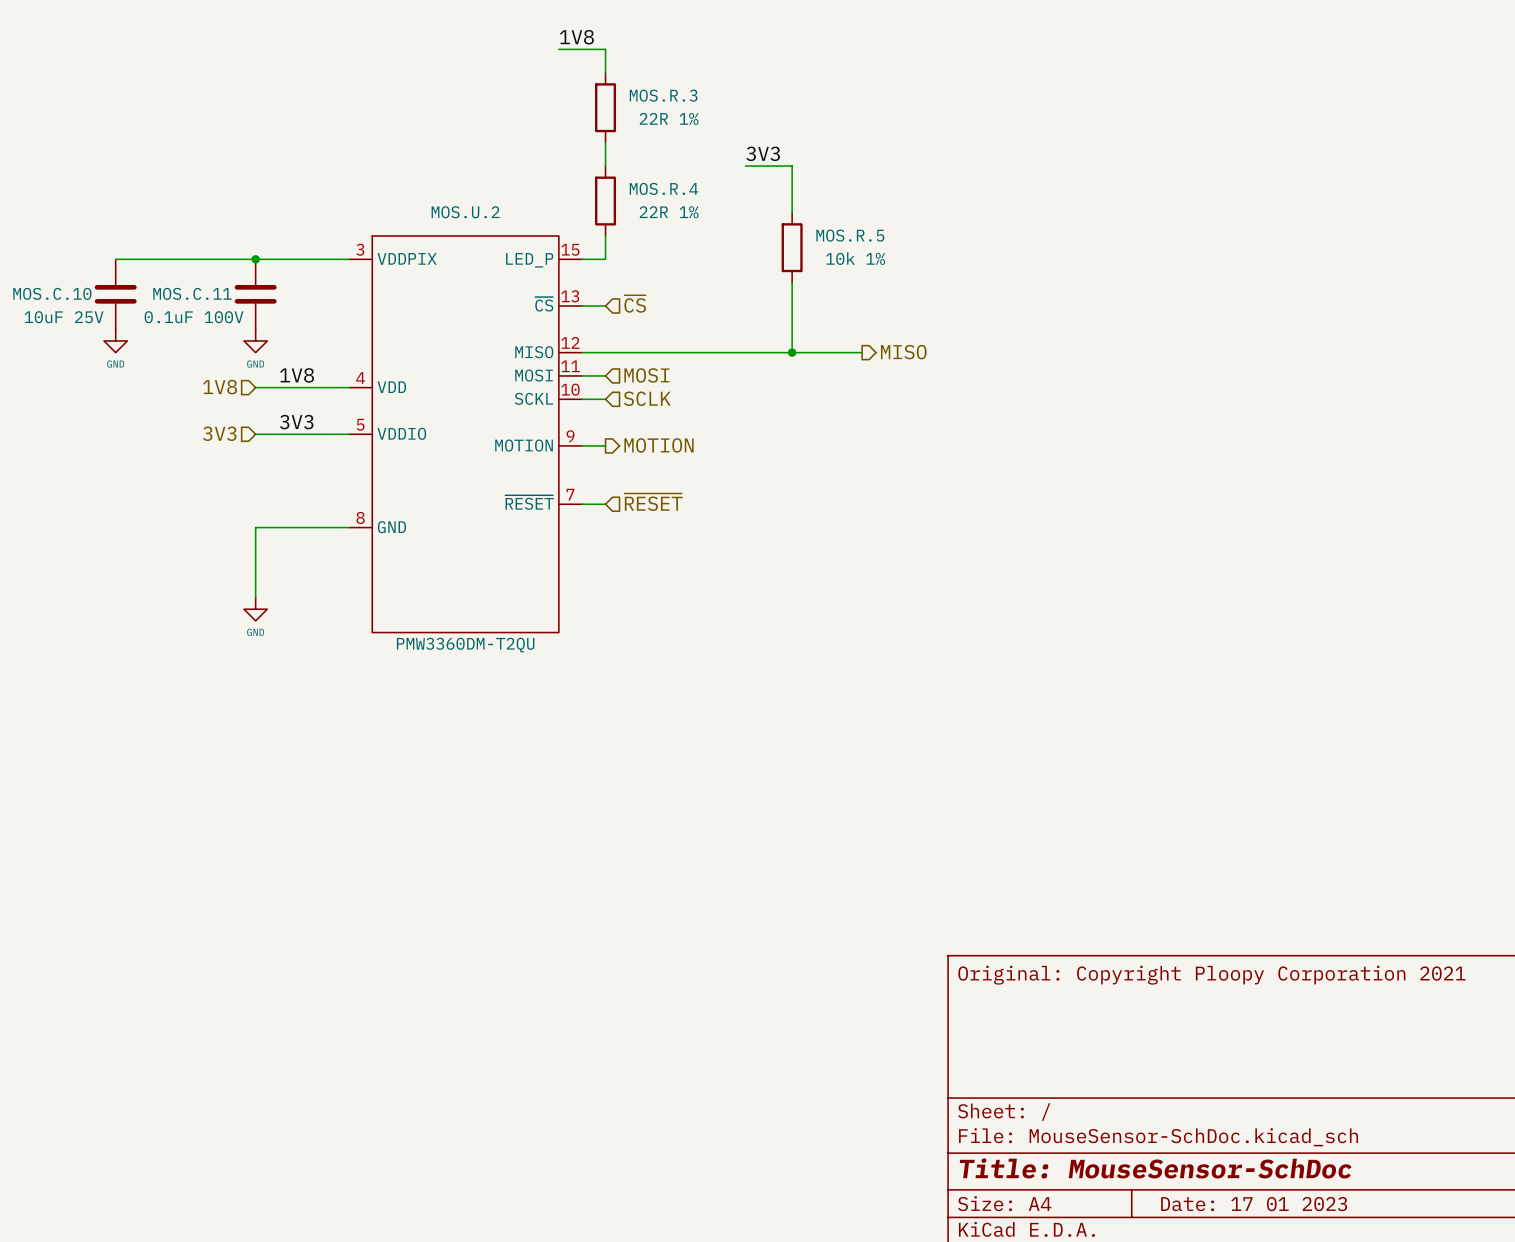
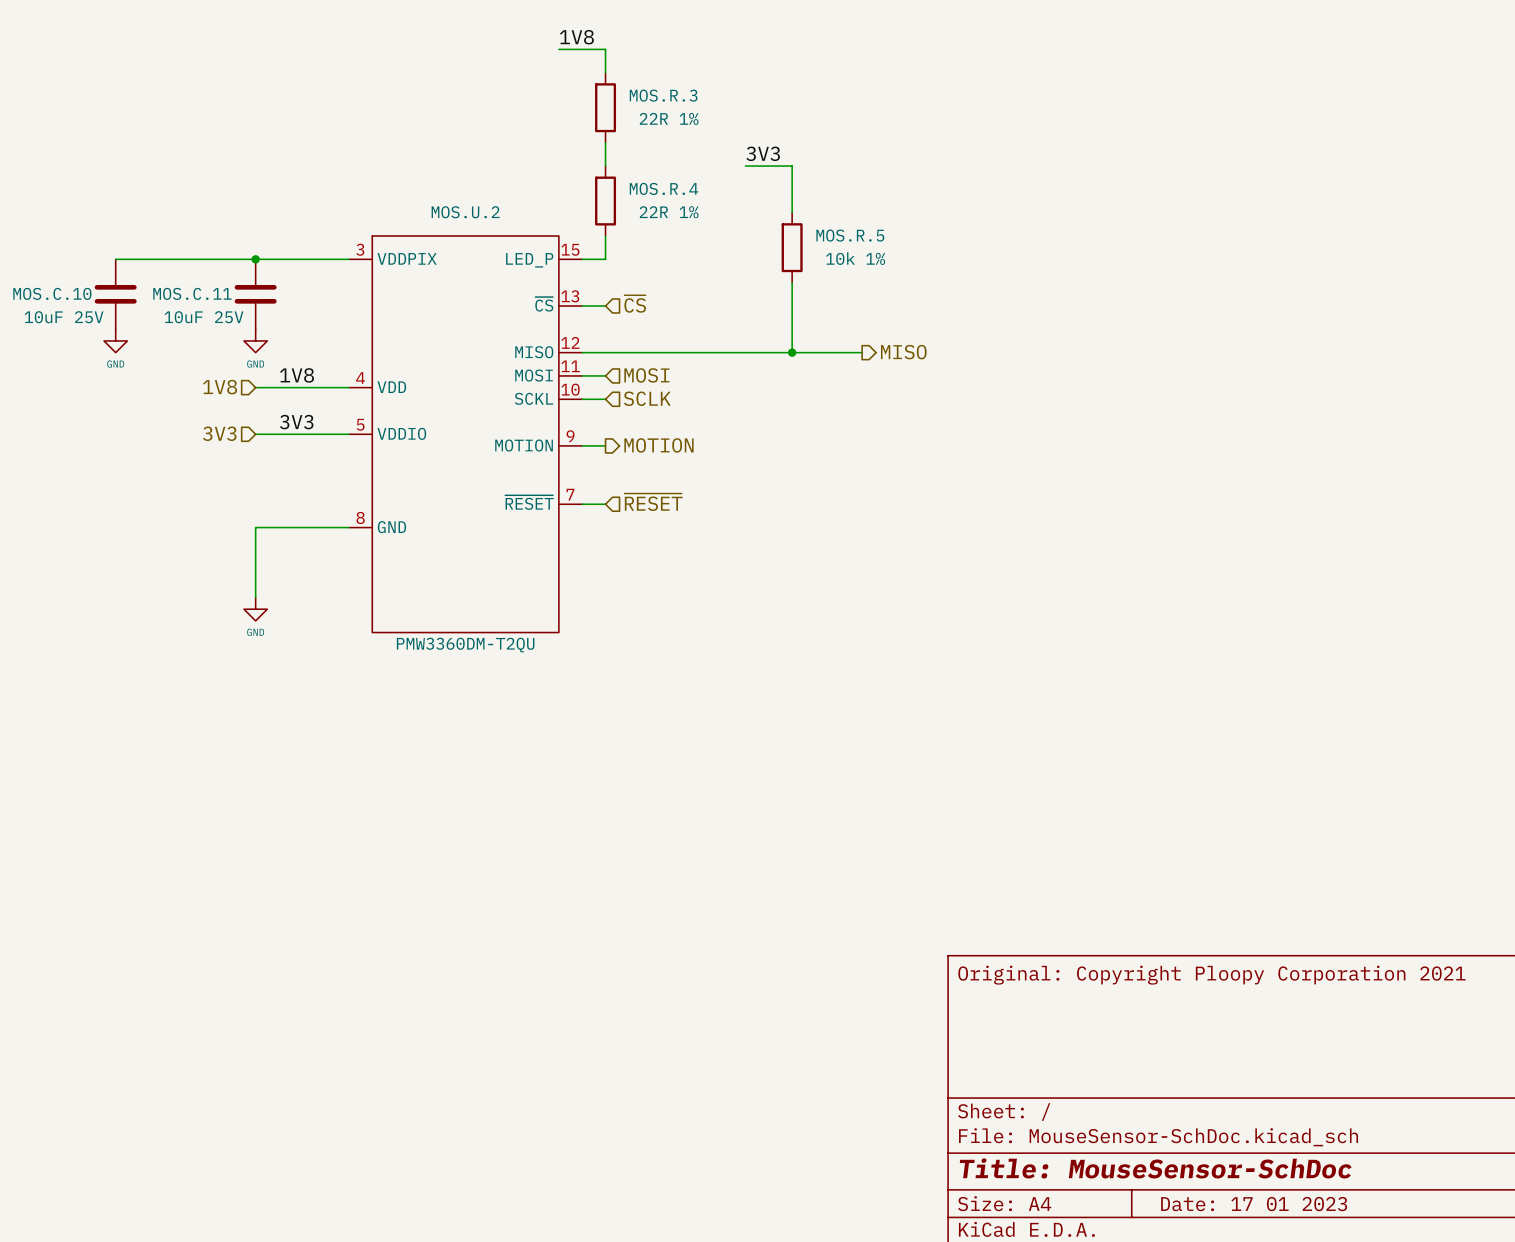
MOS.C.11 value: 0.1uF 100V (194, 317) -> 10uF 25V (204, 317)

